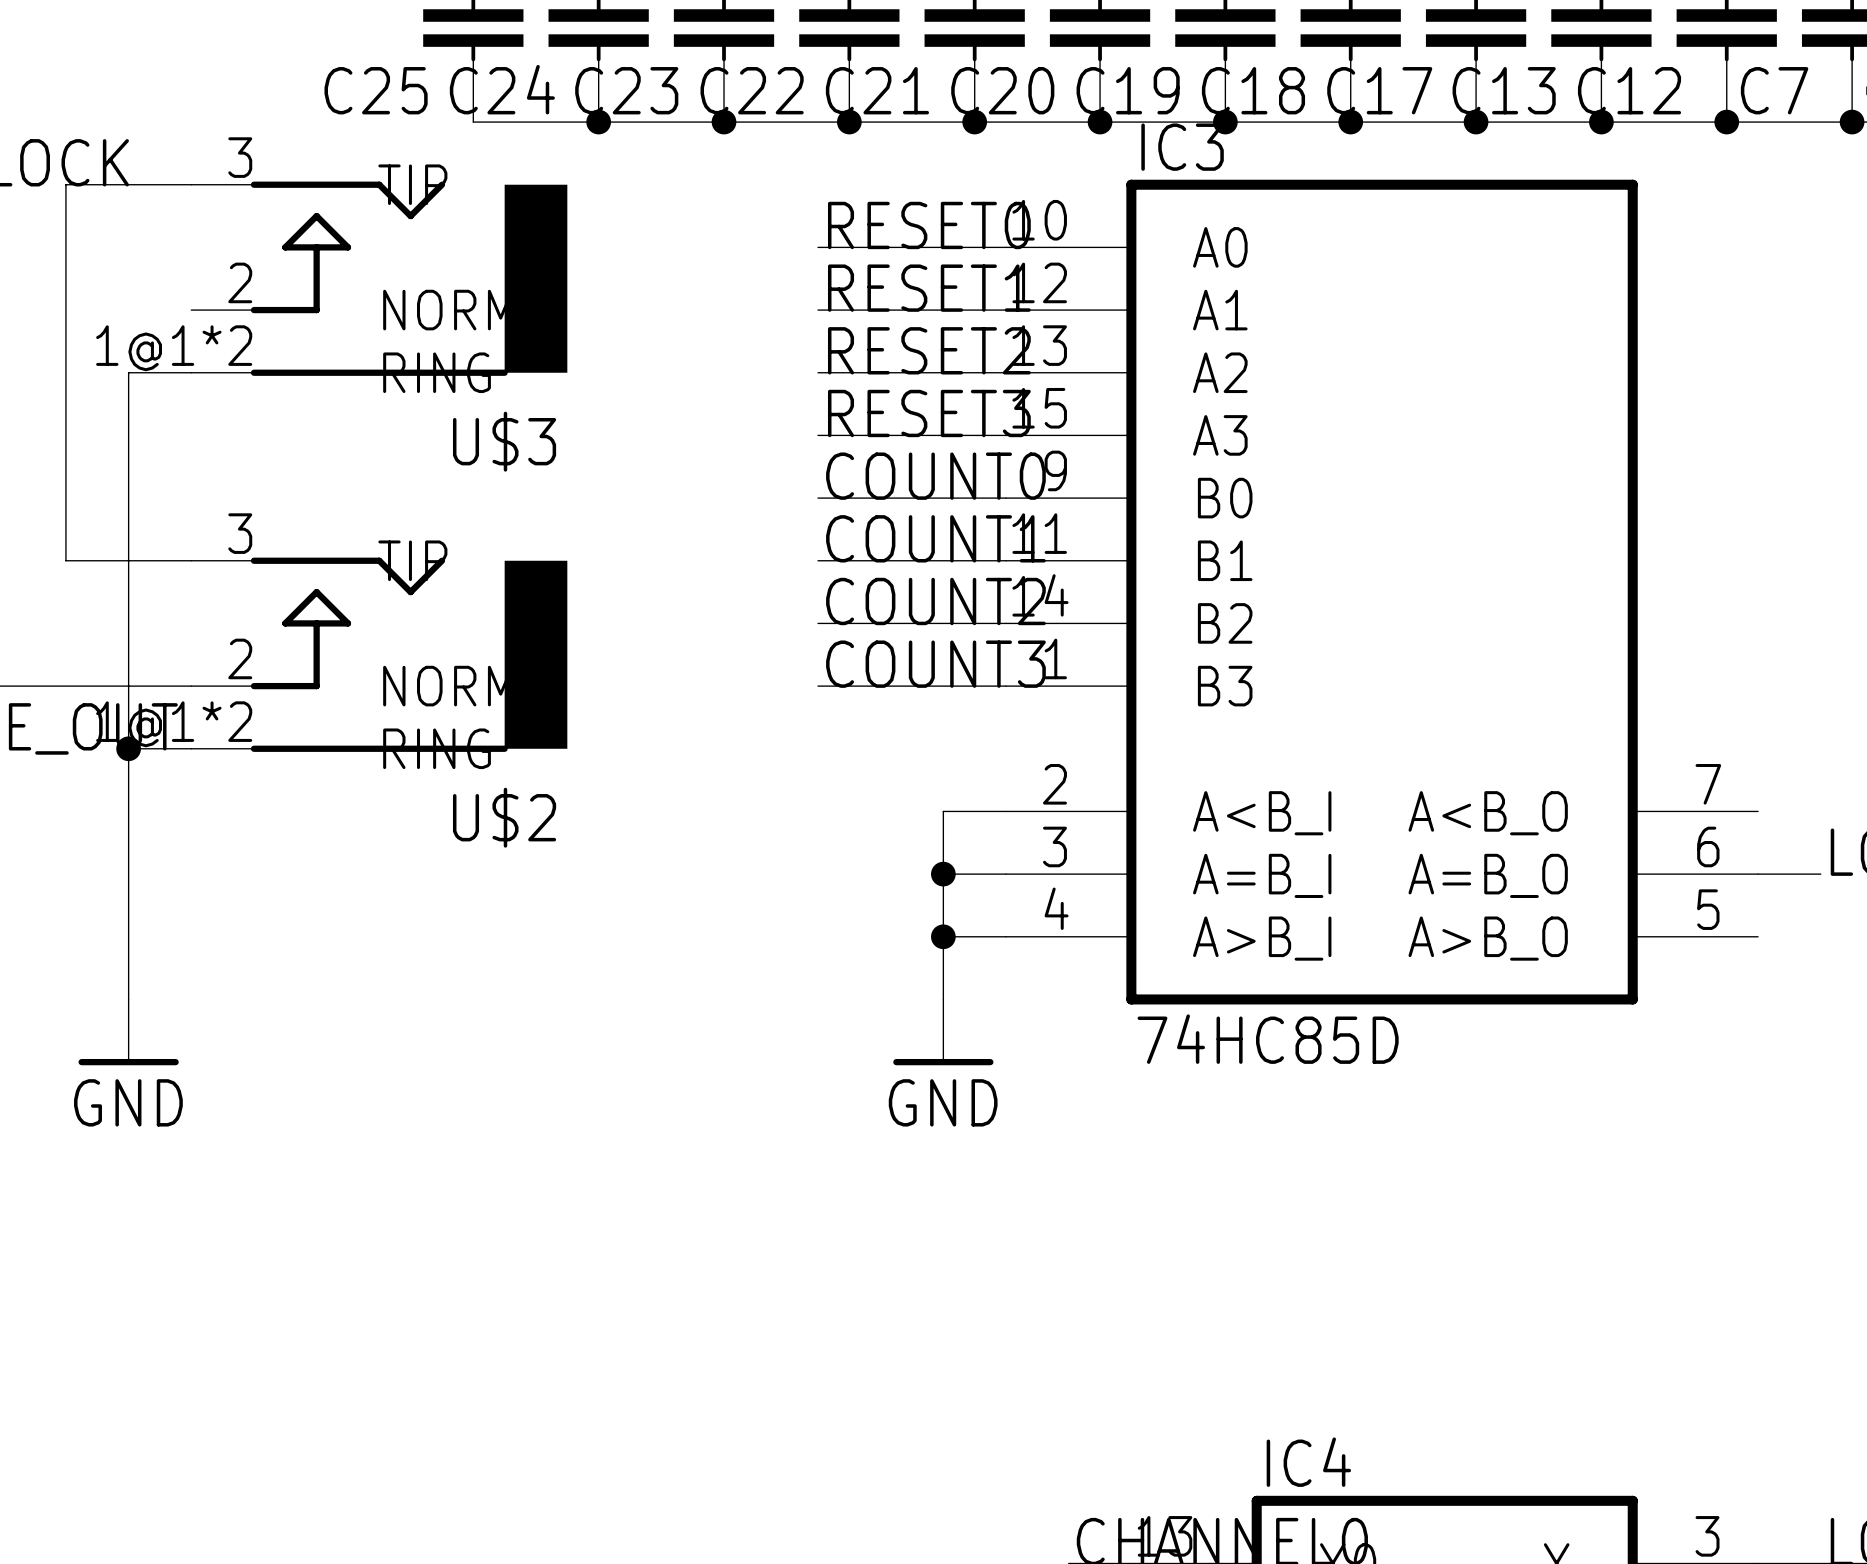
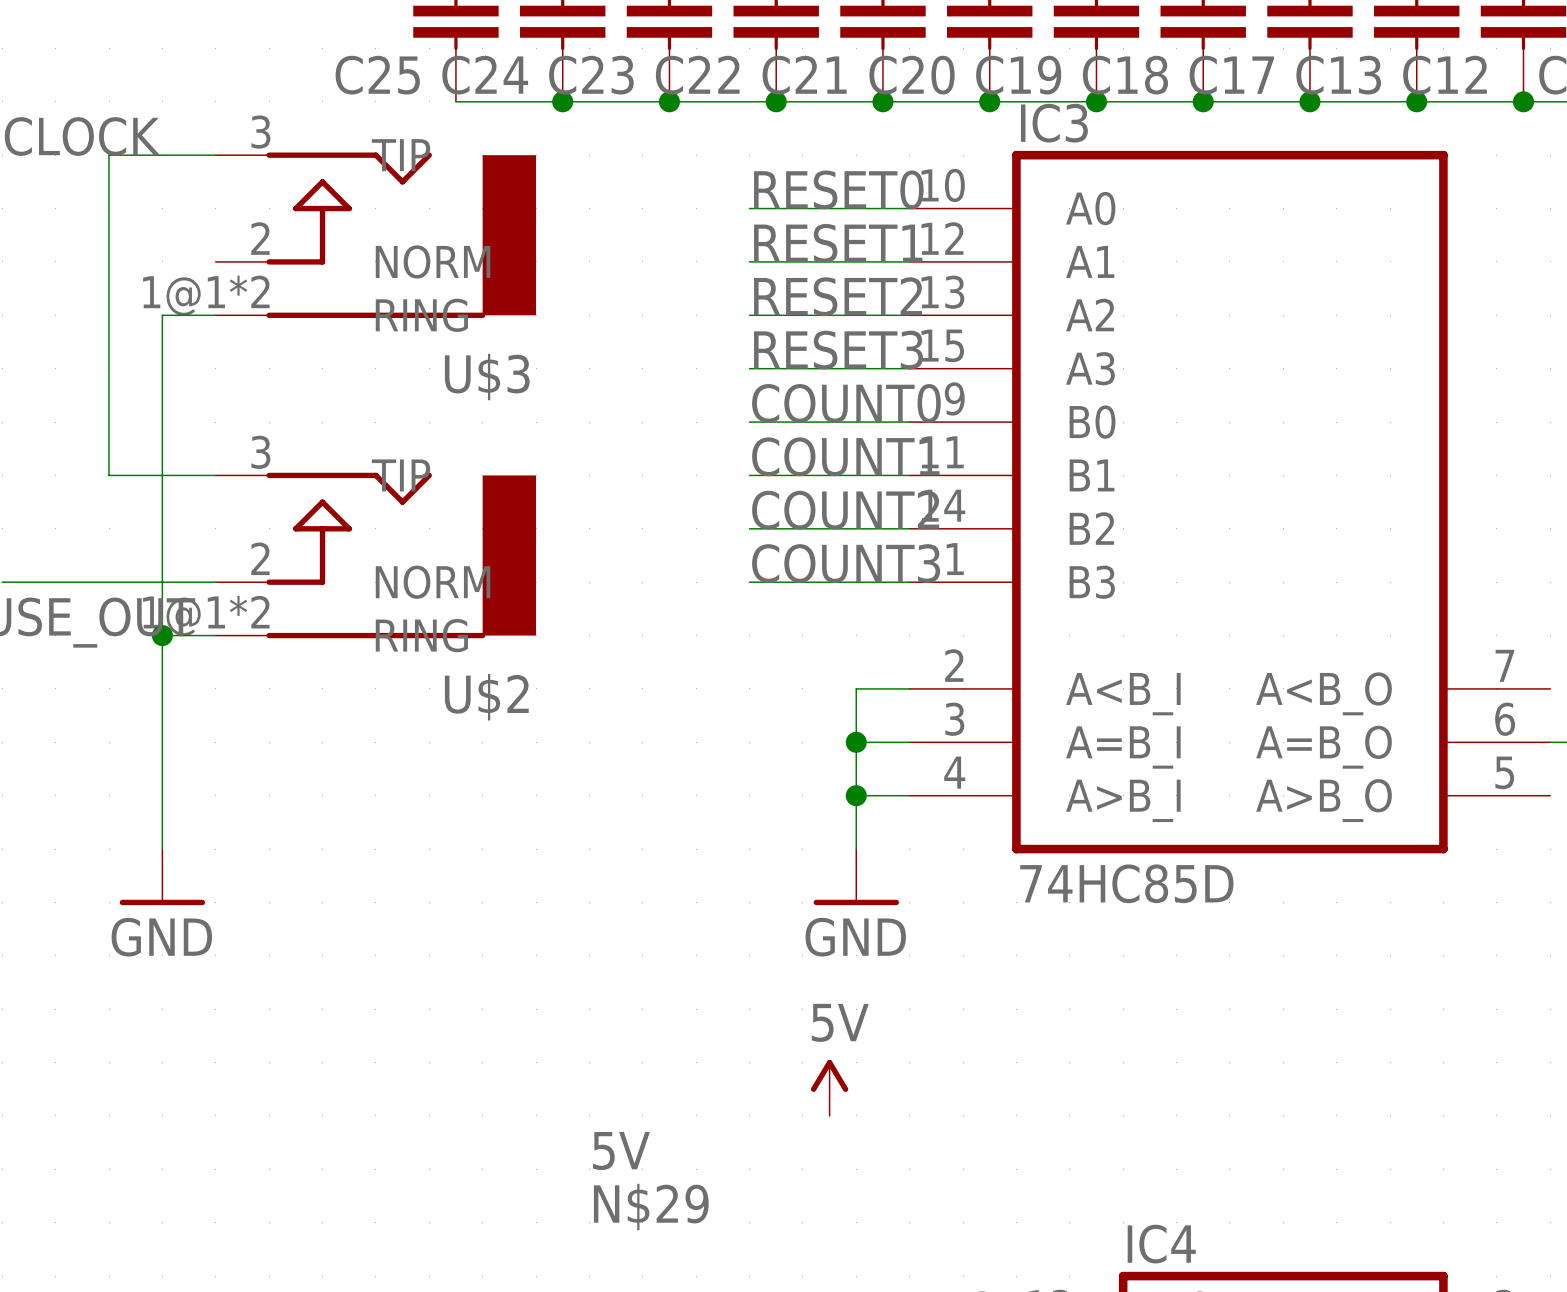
power symbol: none -> 5V (829, 1087)
label: none -> 5V (621, 1151)
label: none -> N$29 (651, 1207)

